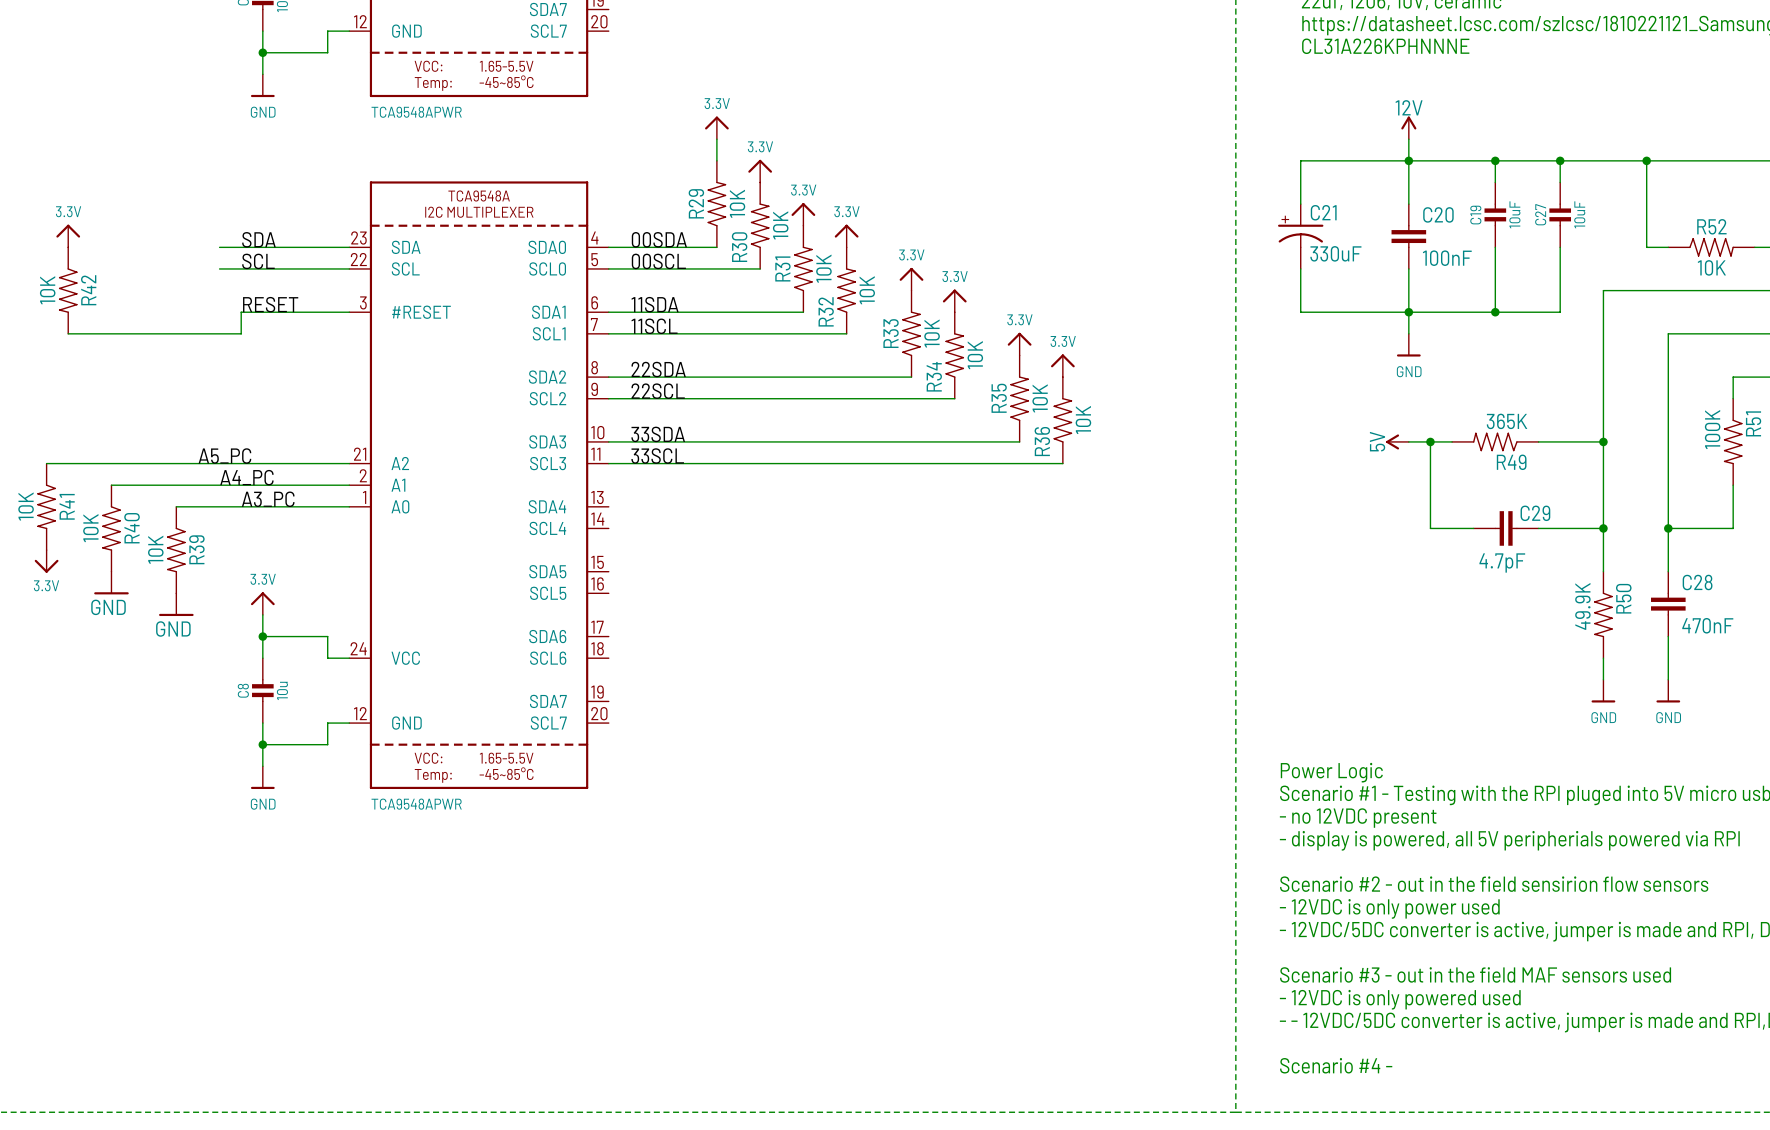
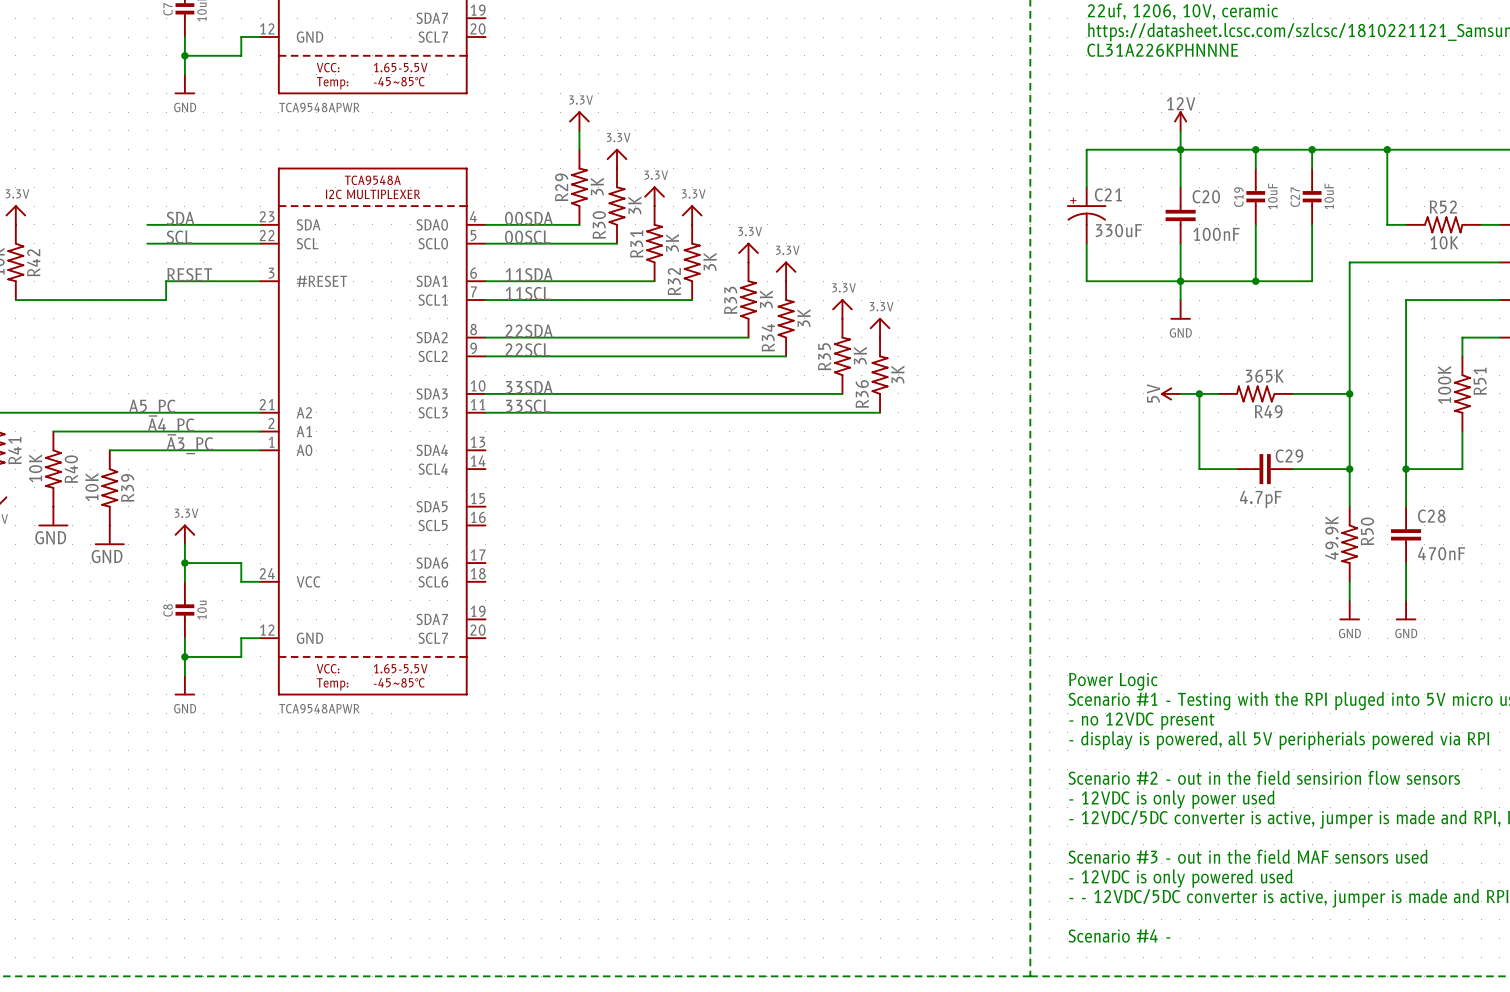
R29 value: 10K (737, 203) -> 3K (597, 186)
R30 value: 10K (780, 225) -> 3K (634, 205)
R31 value: 10K (823, 268) -> 3K (672, 242)
R32 value: 10K (867, 290) -> 3K (710, 261)
R33 value: 10K (932, 333) -> 3K (766, 299)
R34 value: 10K (975, 355) -> 3K (803, 318)
R35 value: 10K (1040, 398) -> 3K (860, 355)
R36 value: 10K (1083, 420) -> 3K (897, 374)

